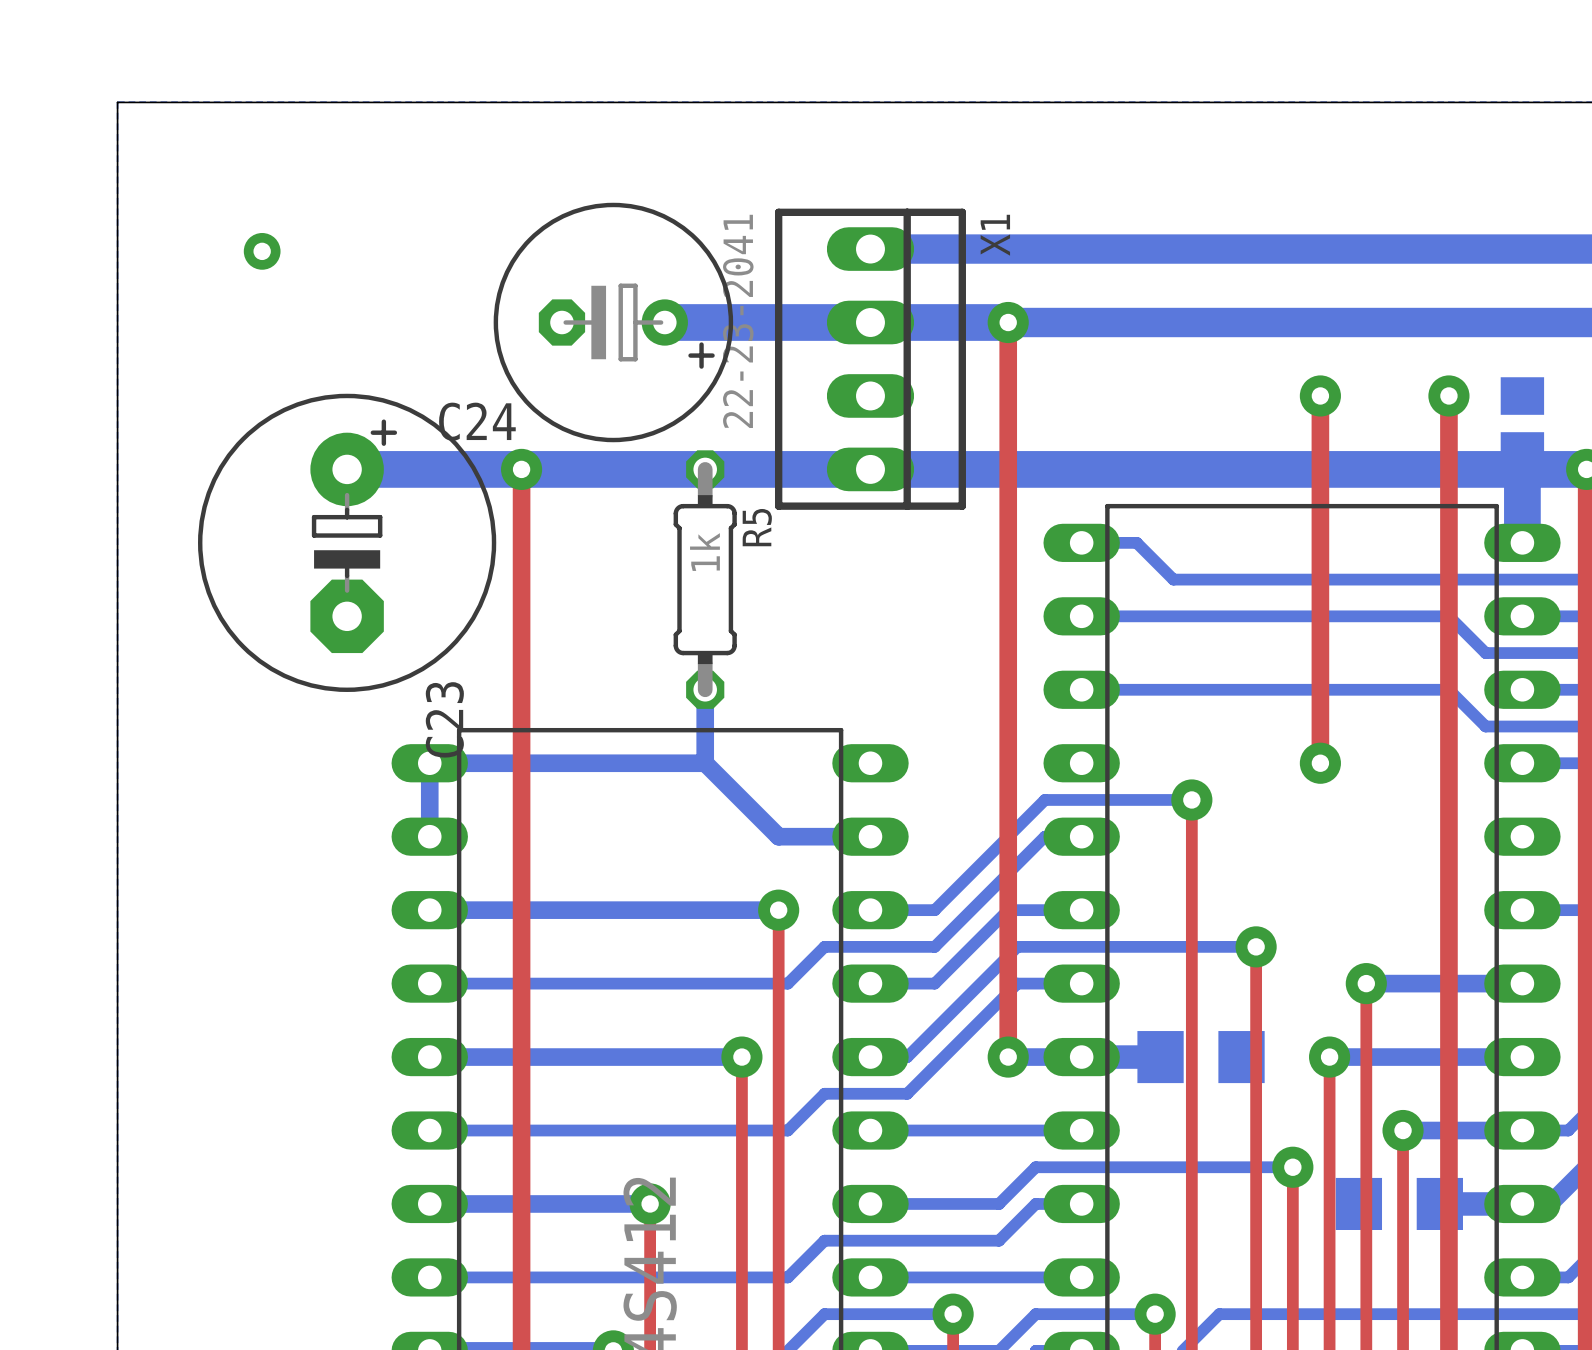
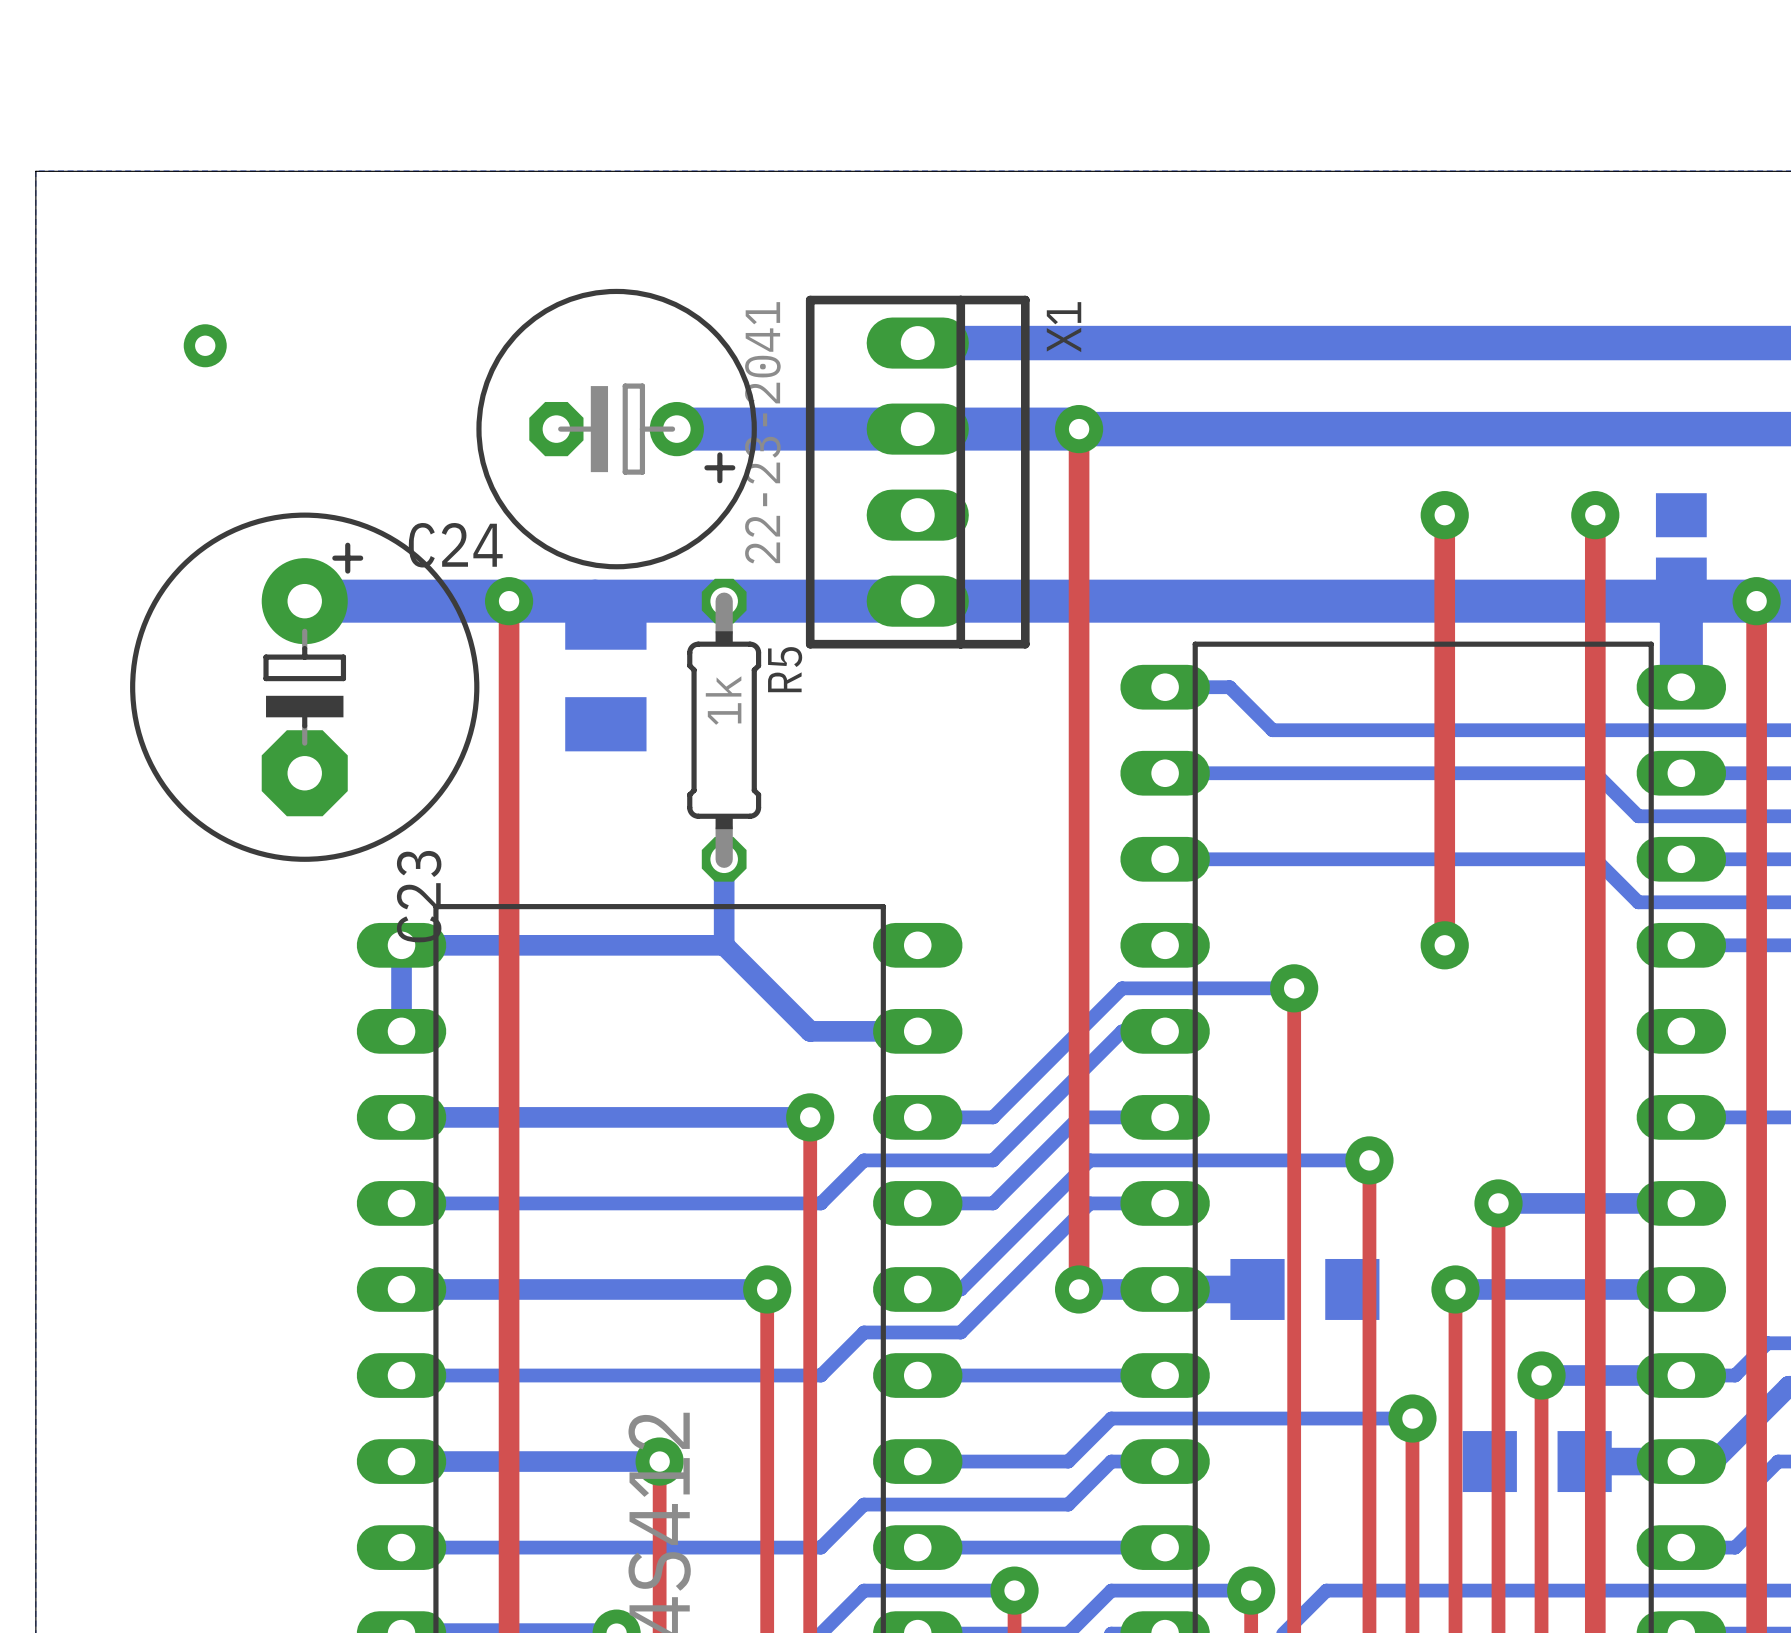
part: none -> (605, 673)

